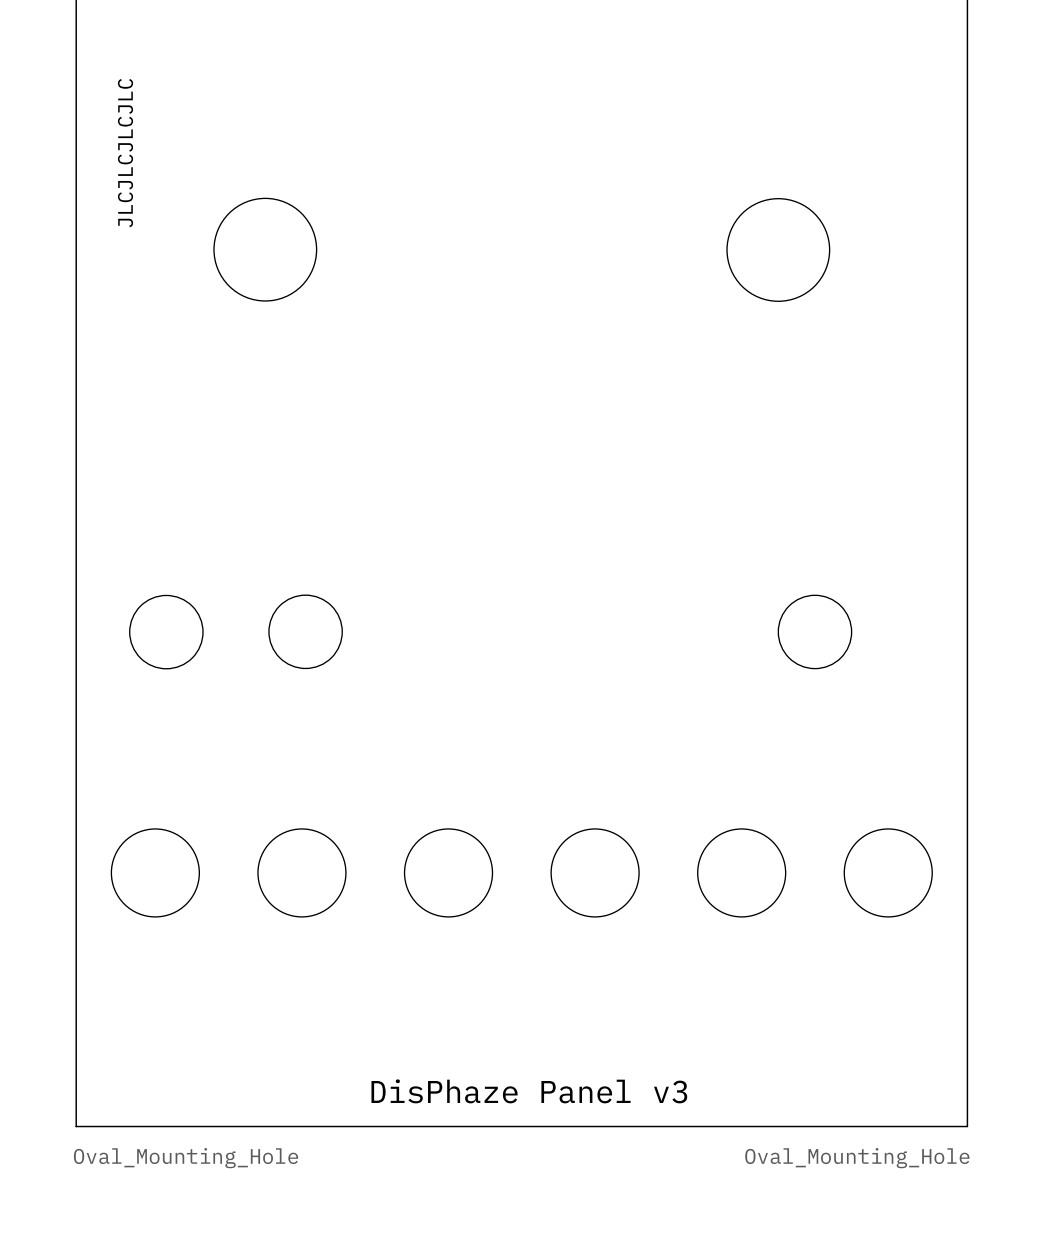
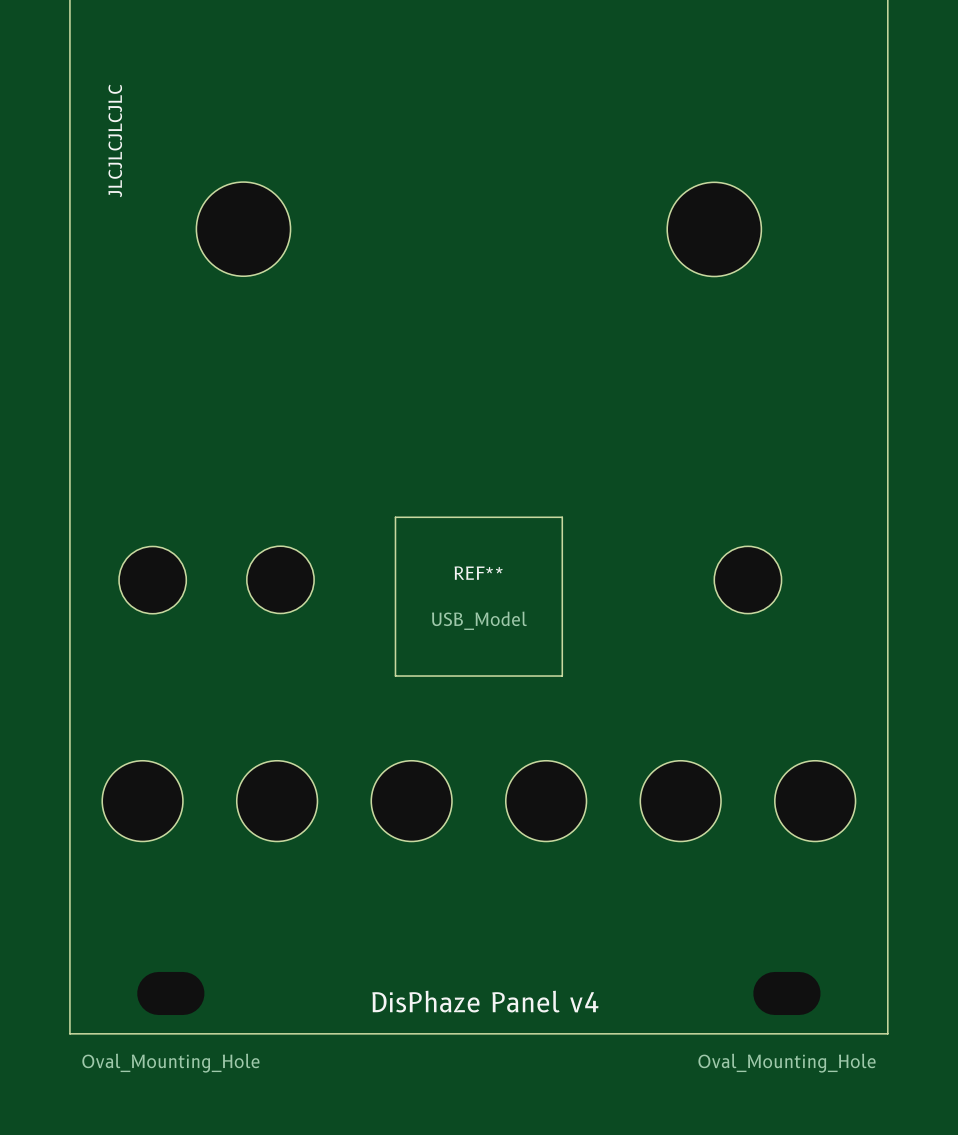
board edge: none -> (395, 517) (562, 517) (562, 676) (395, 676) (395, 517)
REF**: none -> USB_Model (479, 598)
text: DisPhaze Panel v3 (529, 1091) -> DisPhaze Panel v4 (485, 1001)

